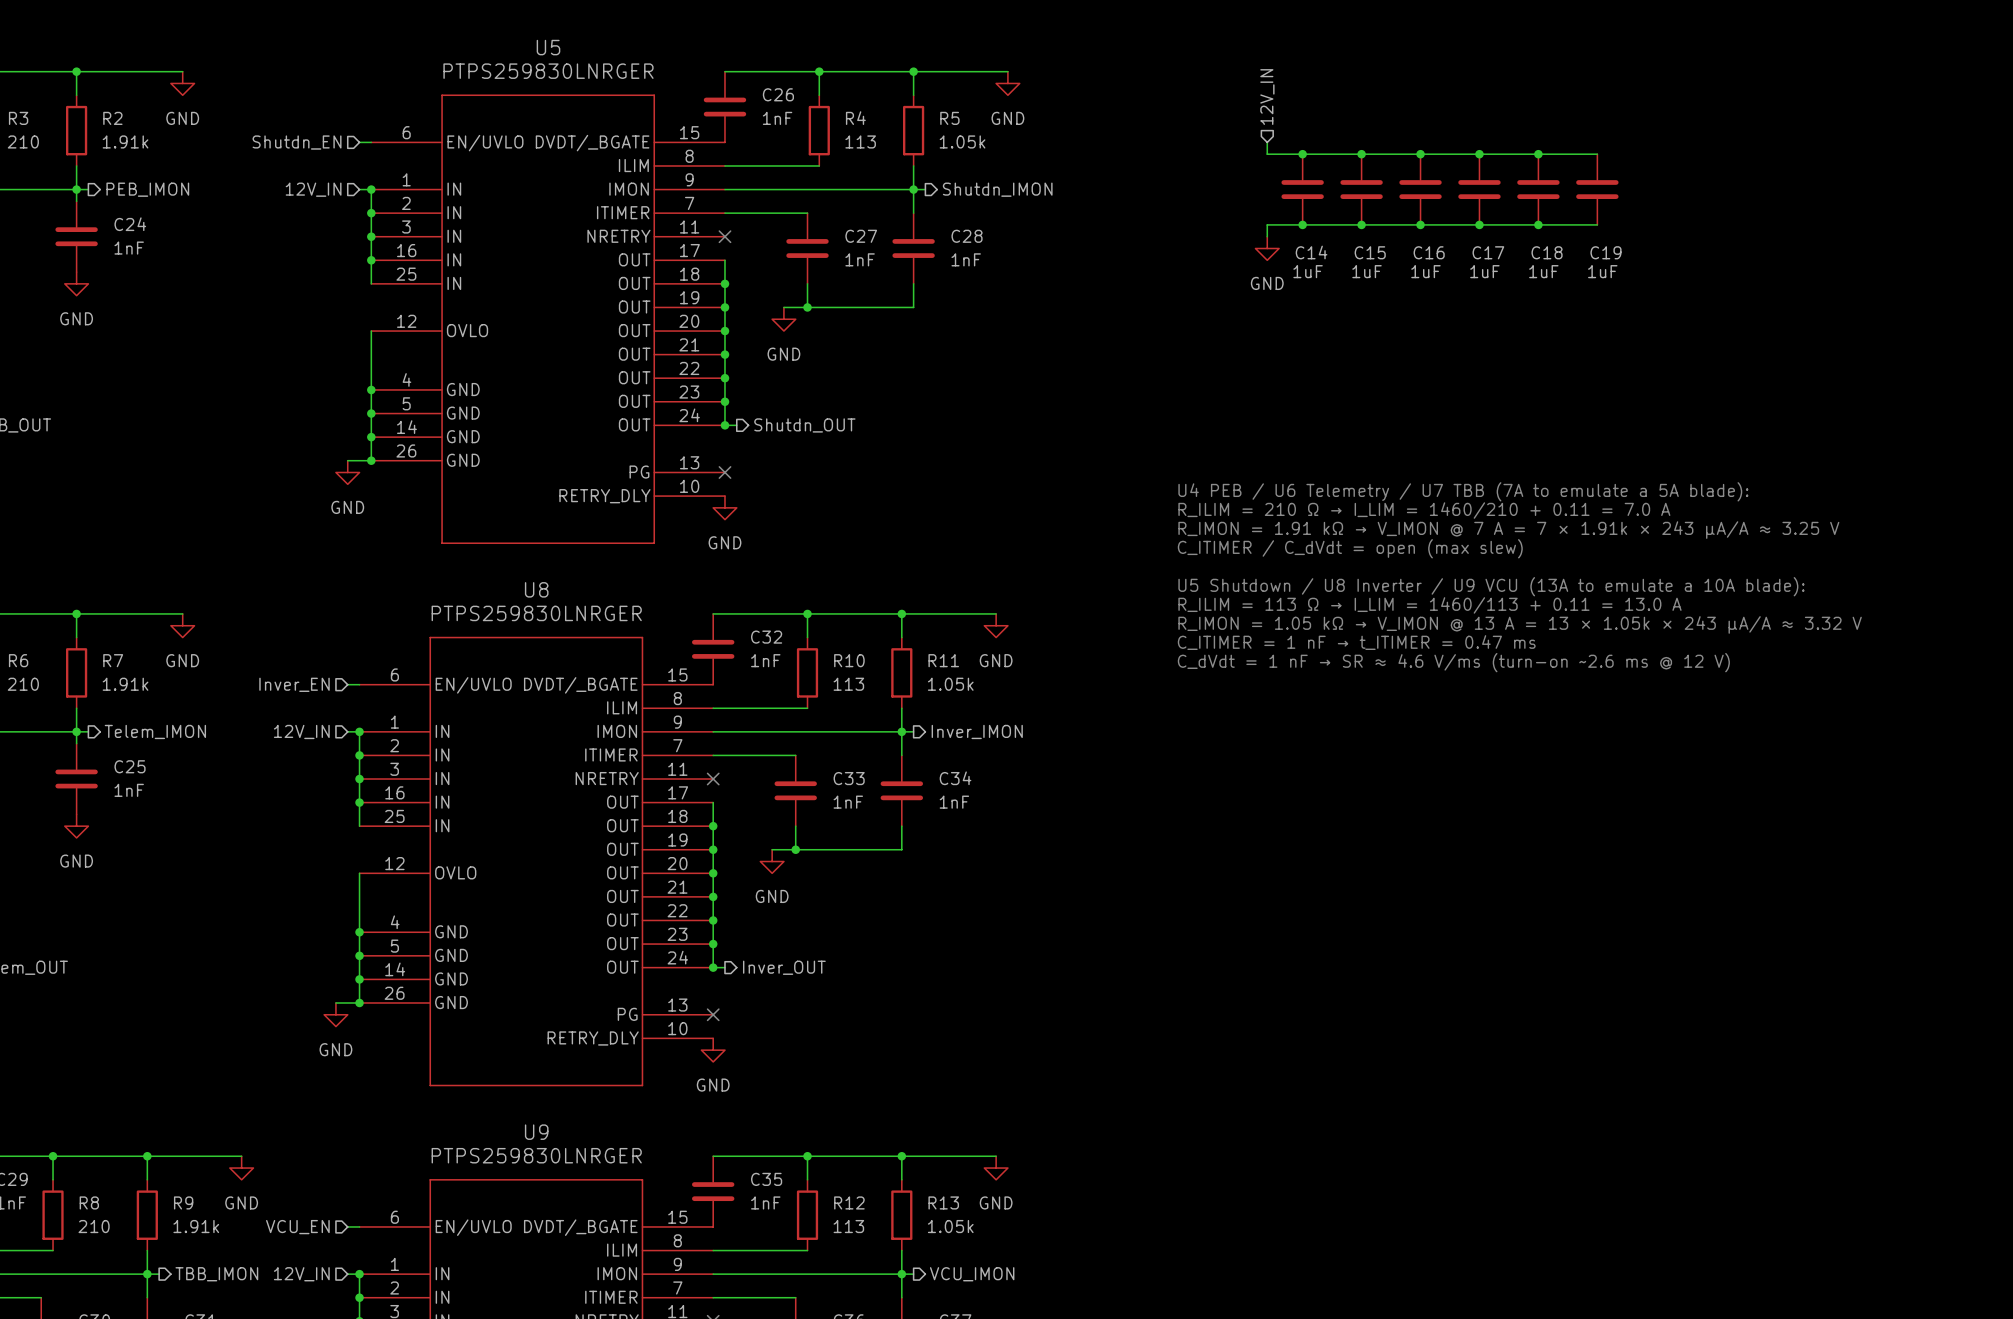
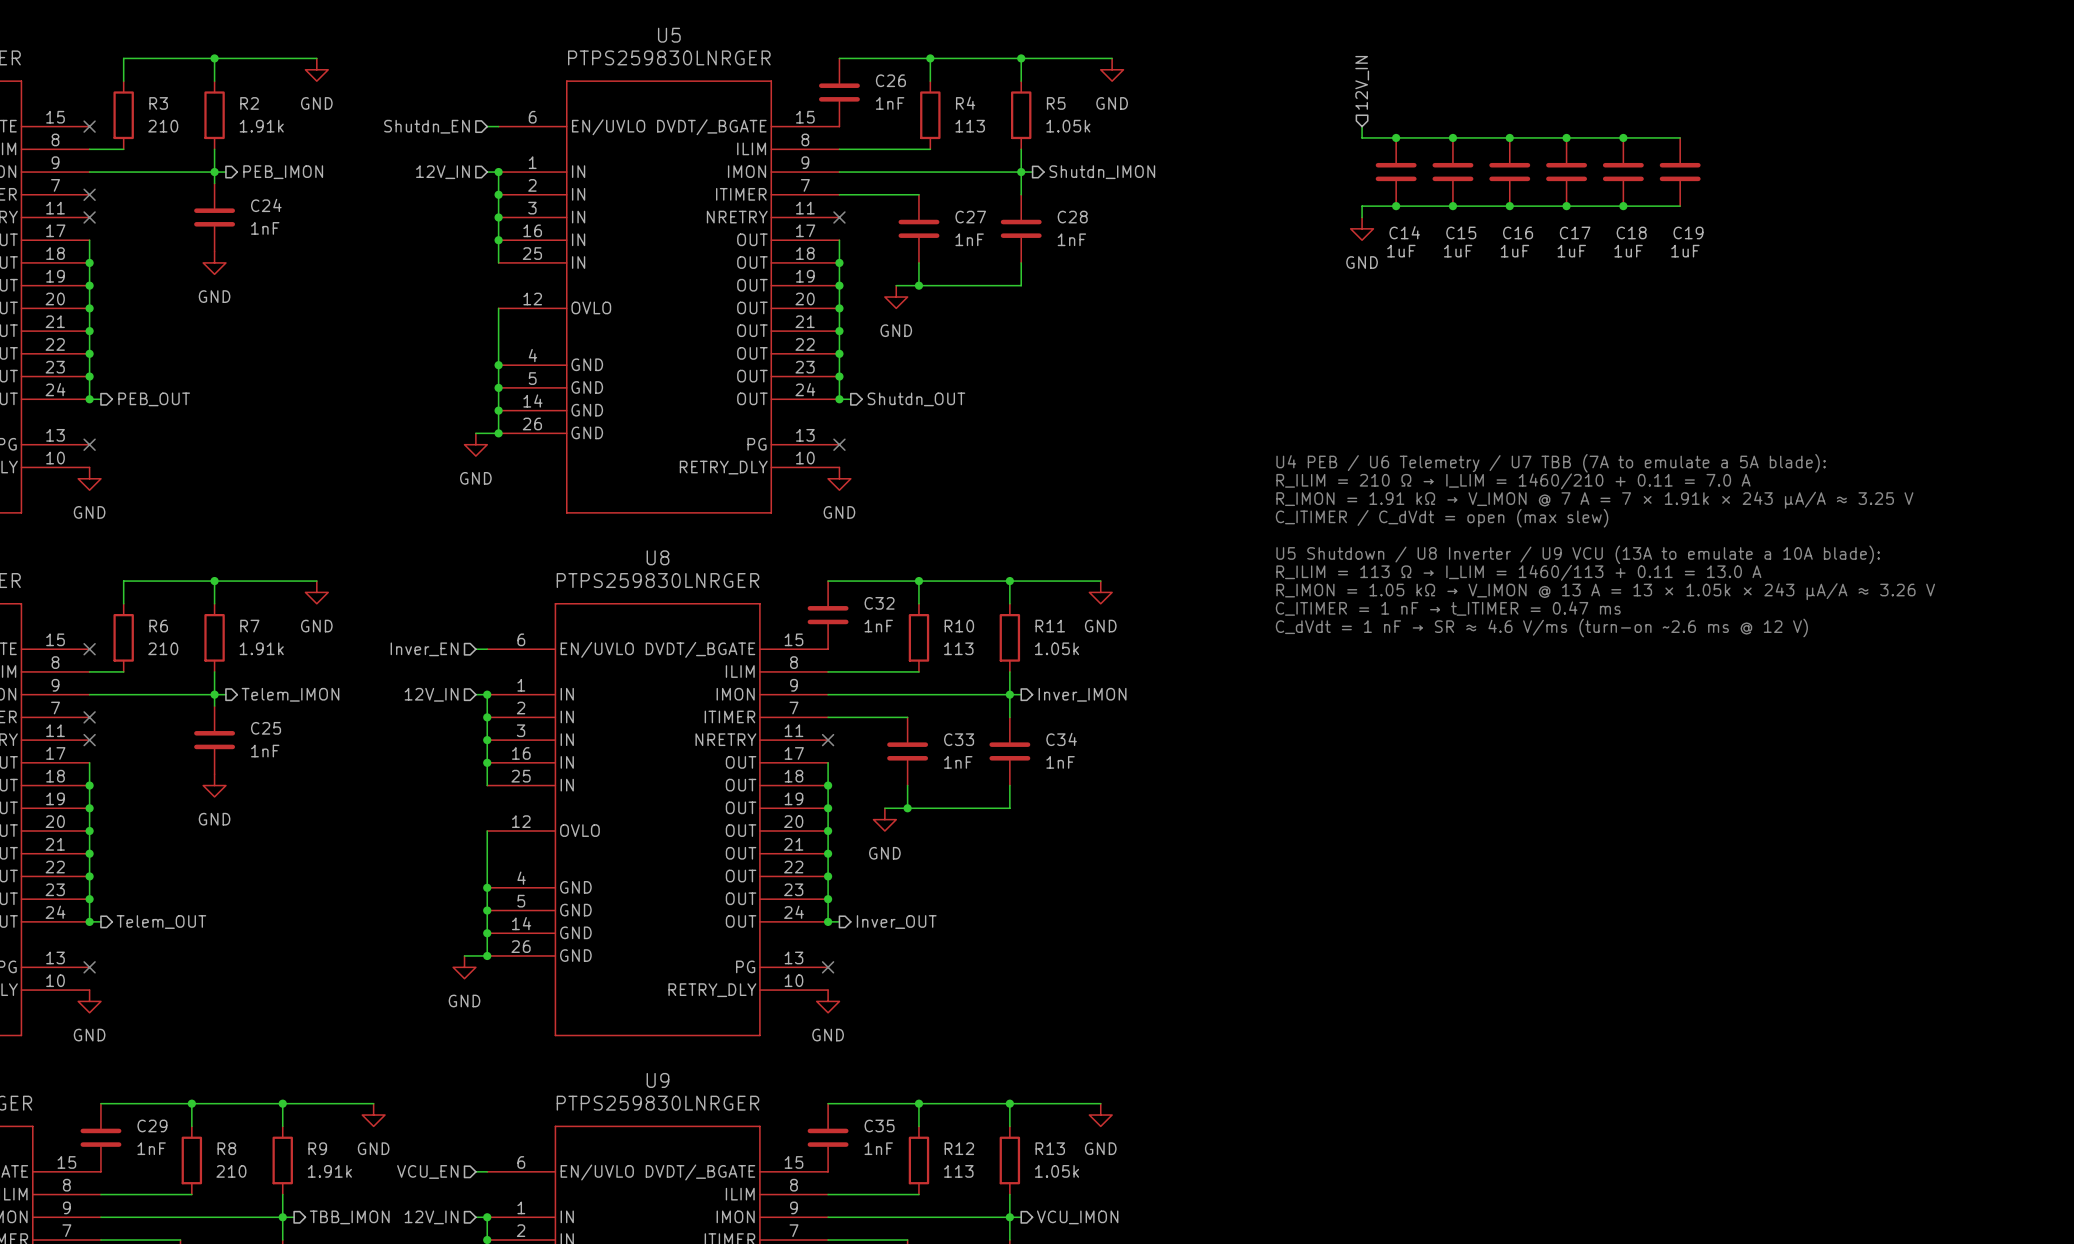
text: R_IMON = 1.05 kΩ → V_IMON @ 13 A = 13 × 1.05k × 243 µA/A ≈ 3.32 V (1520, 624) -> R_IMON = 1.05 kΩ → V_IMON @ 13 A = 13 × 1.05k × 243 µA/A ≈ 3.26 V (1605, 591)

